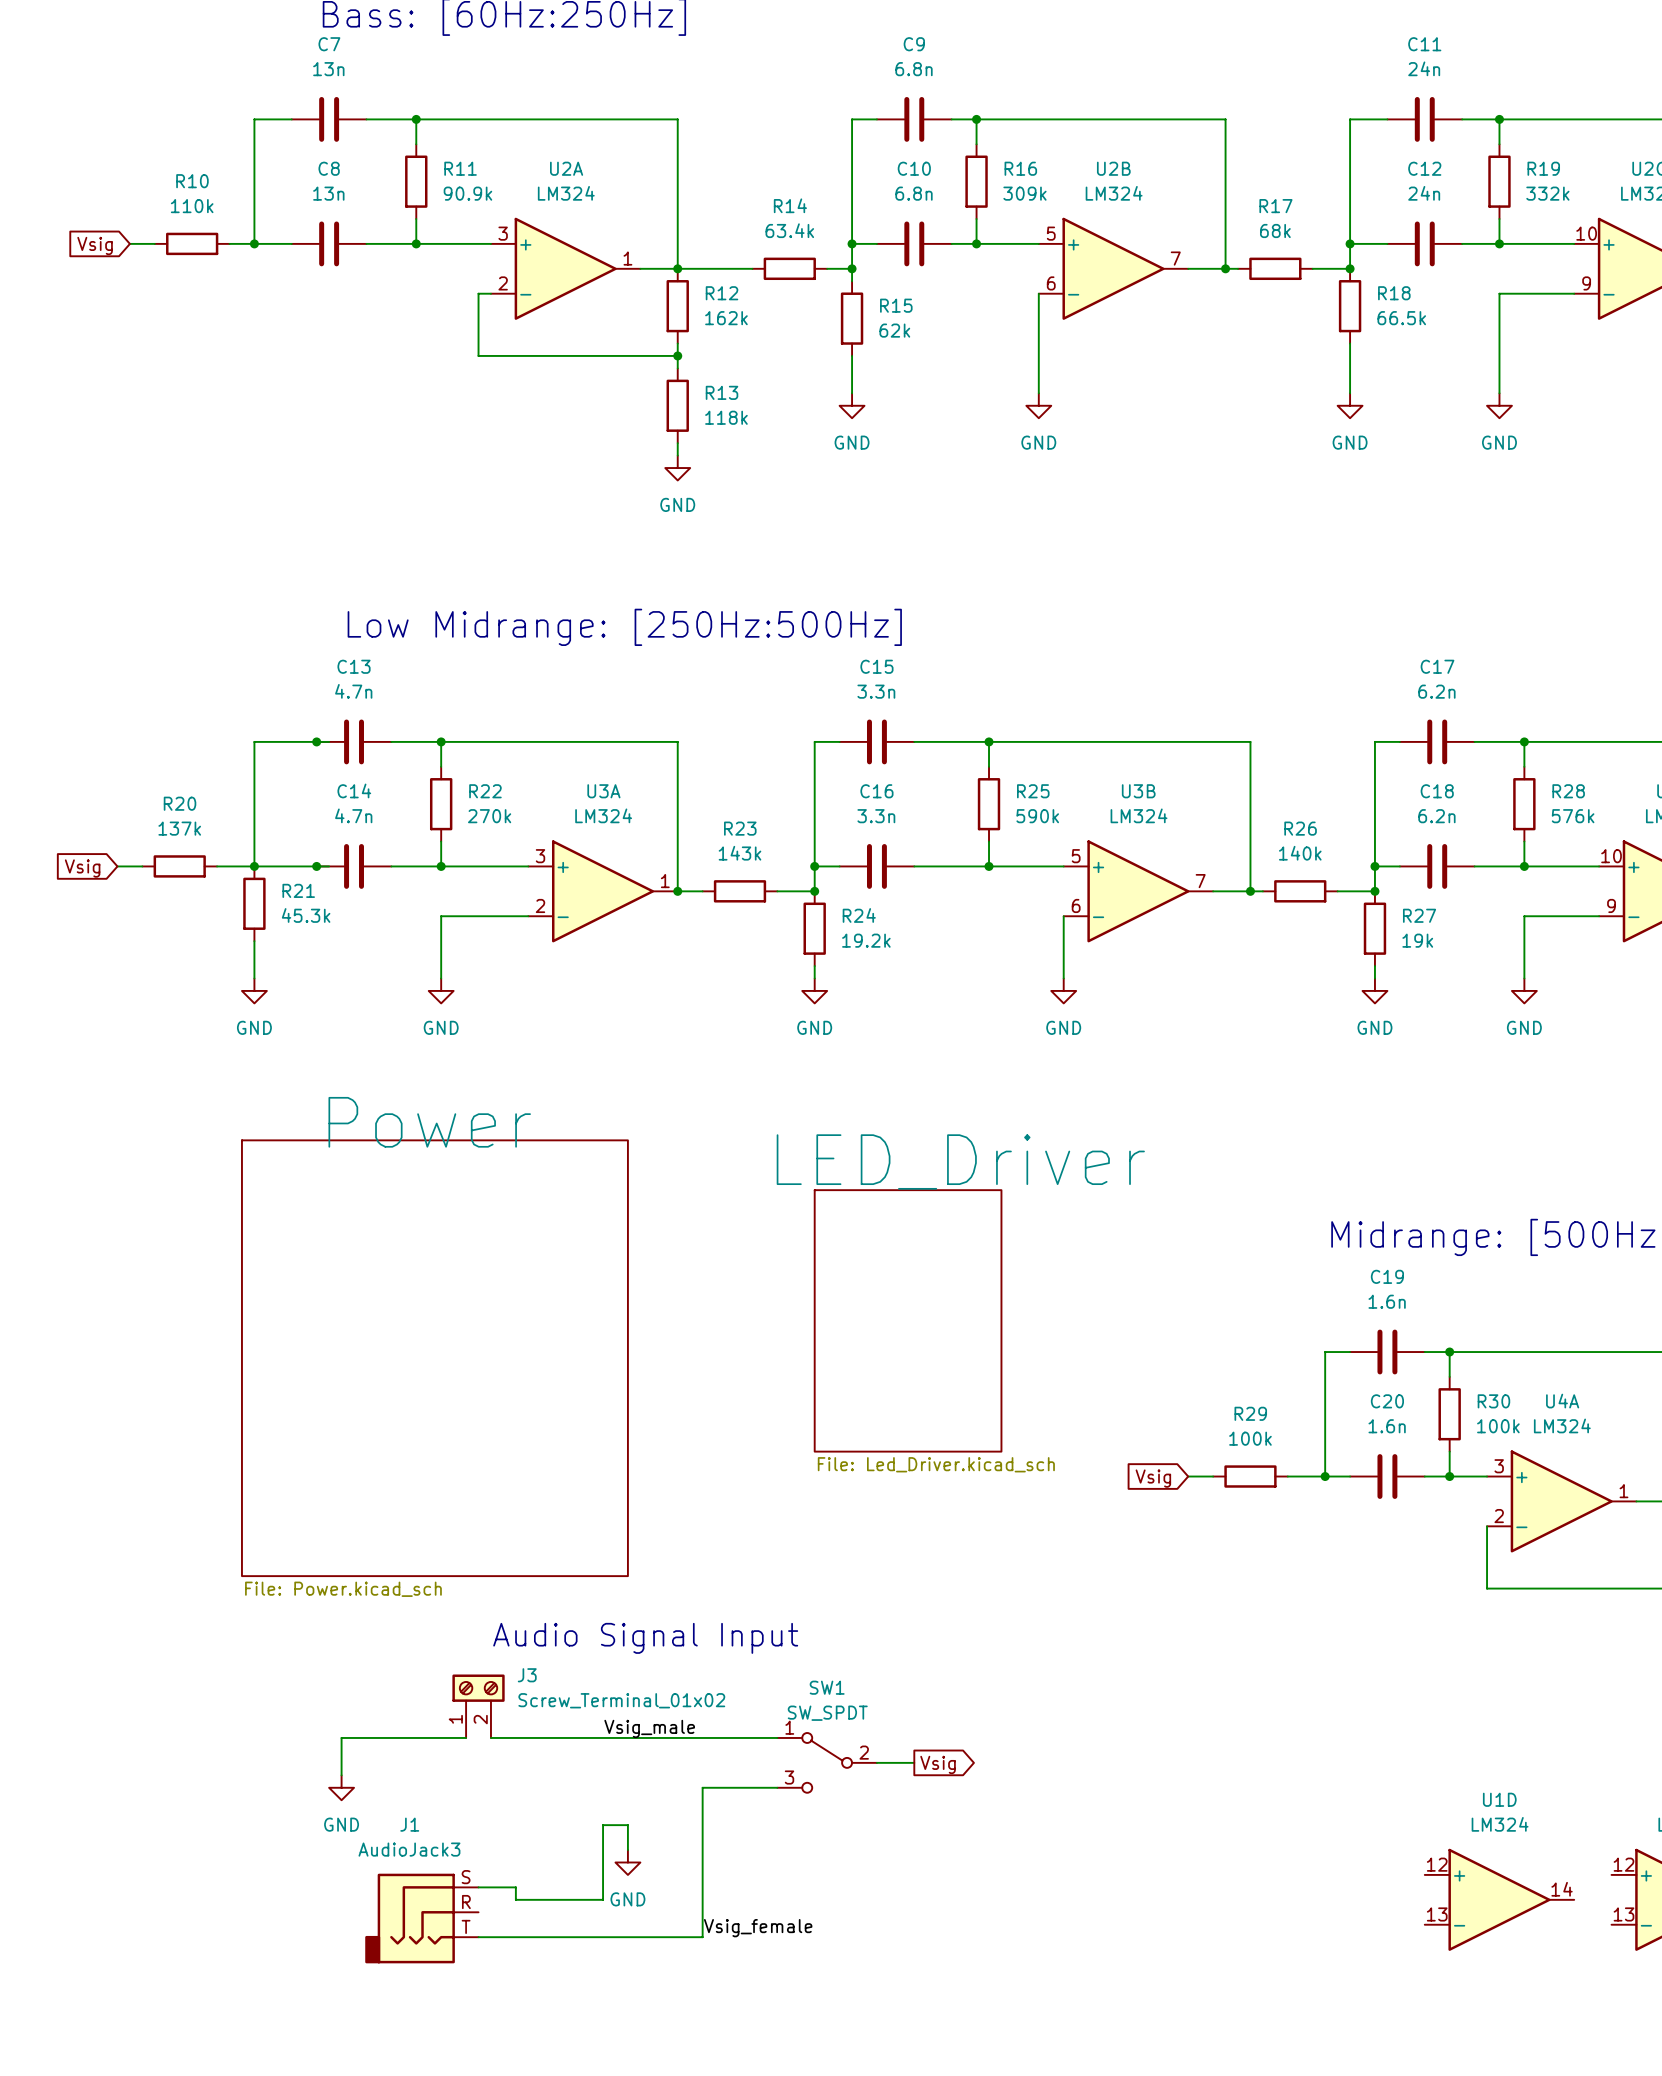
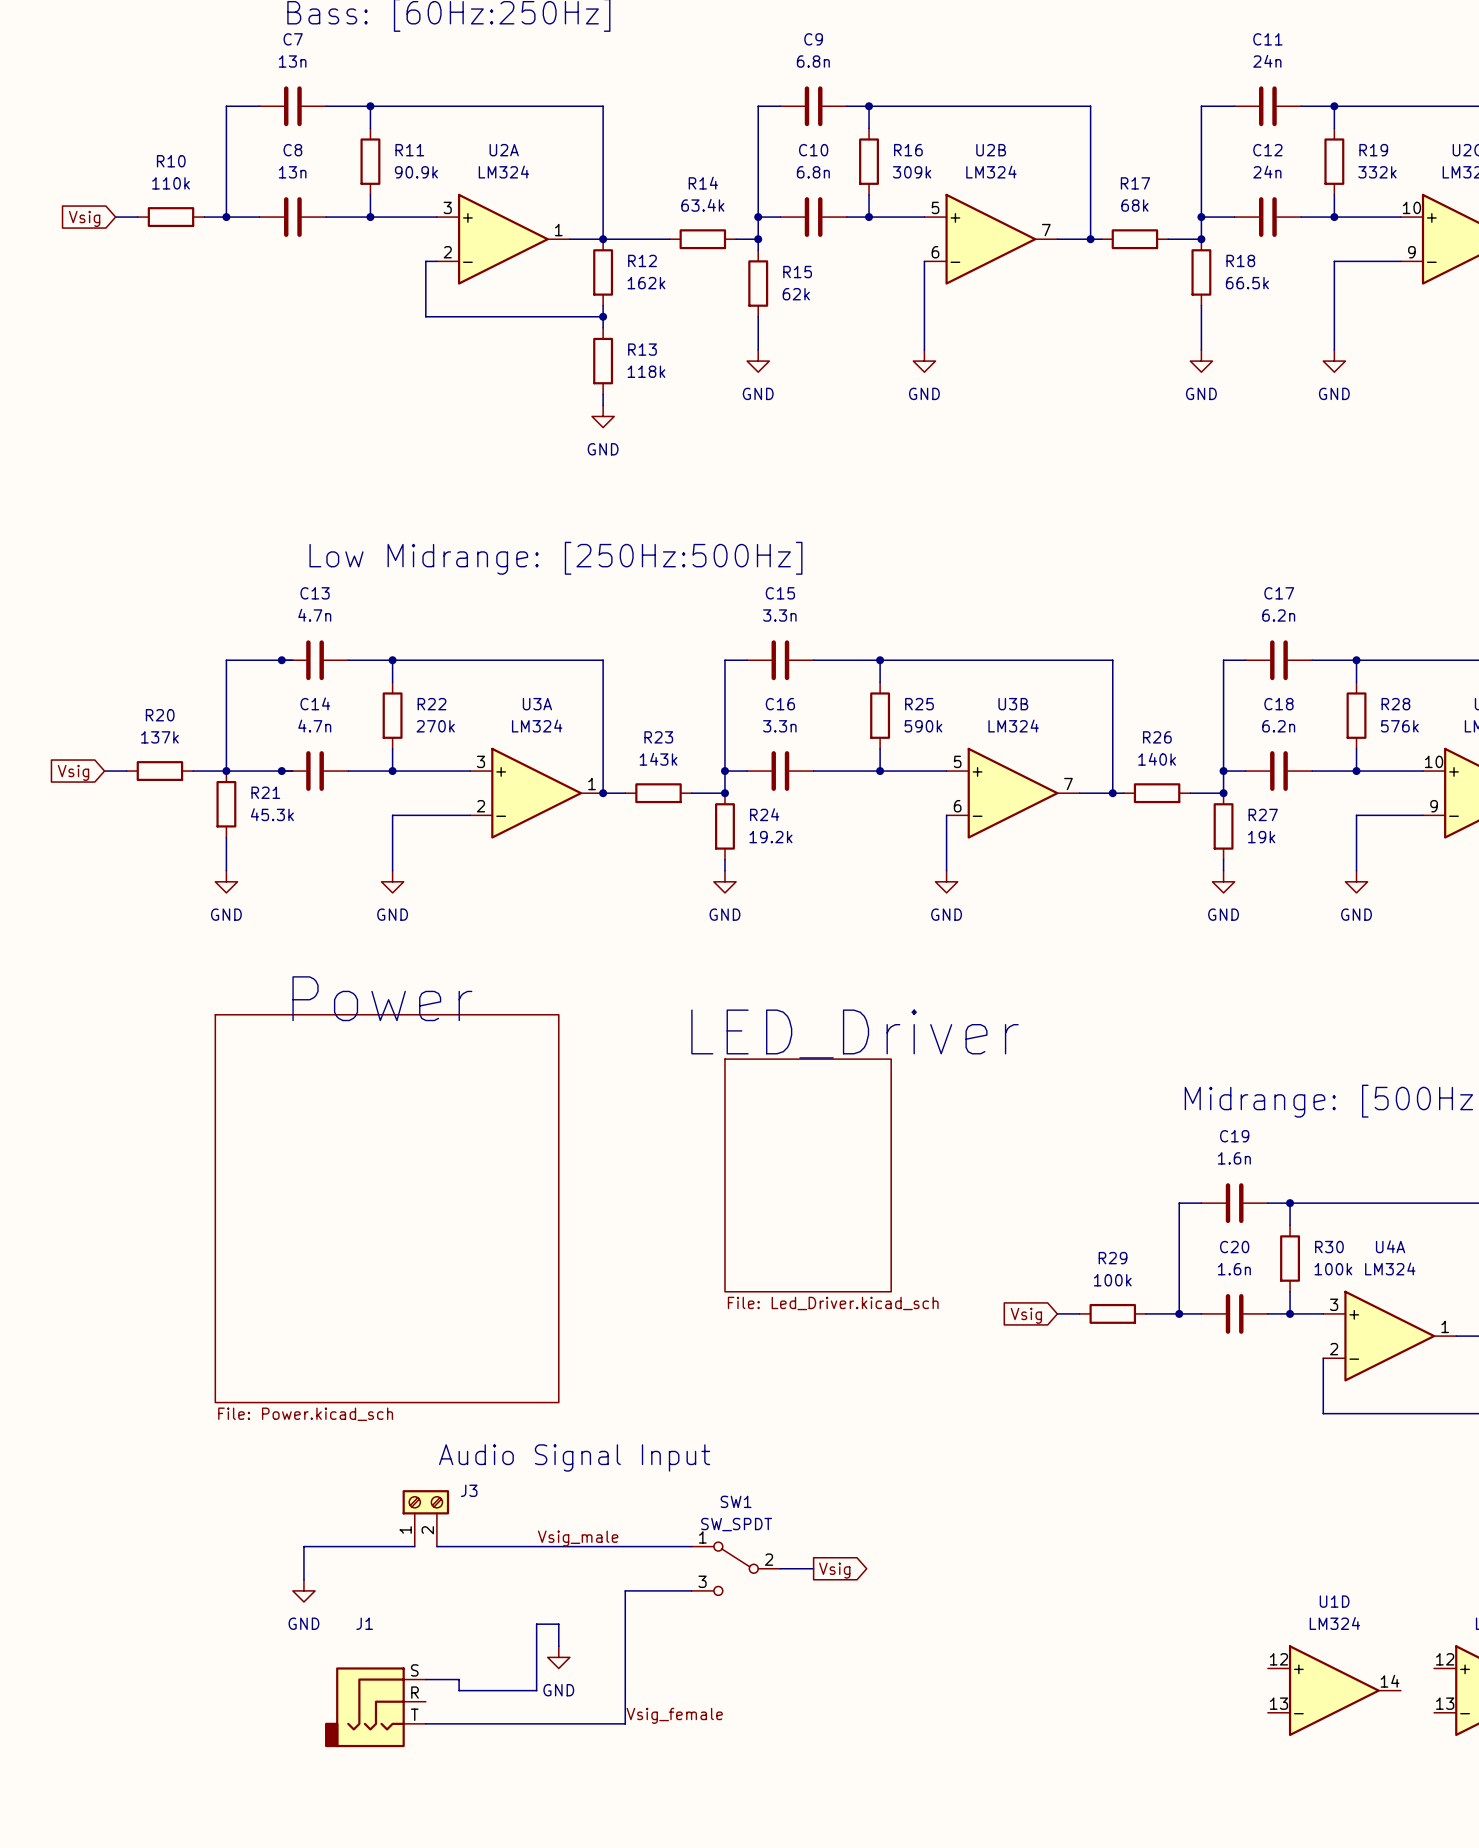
J3 value: Screw_Terminal_01x02 (621, 1700) -> none
J1 value: AudioJack3 (409, 1849) -> none

